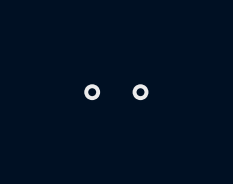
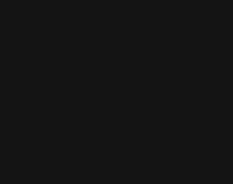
via: (92, 92) -> none
via: (140, 92) -> none

